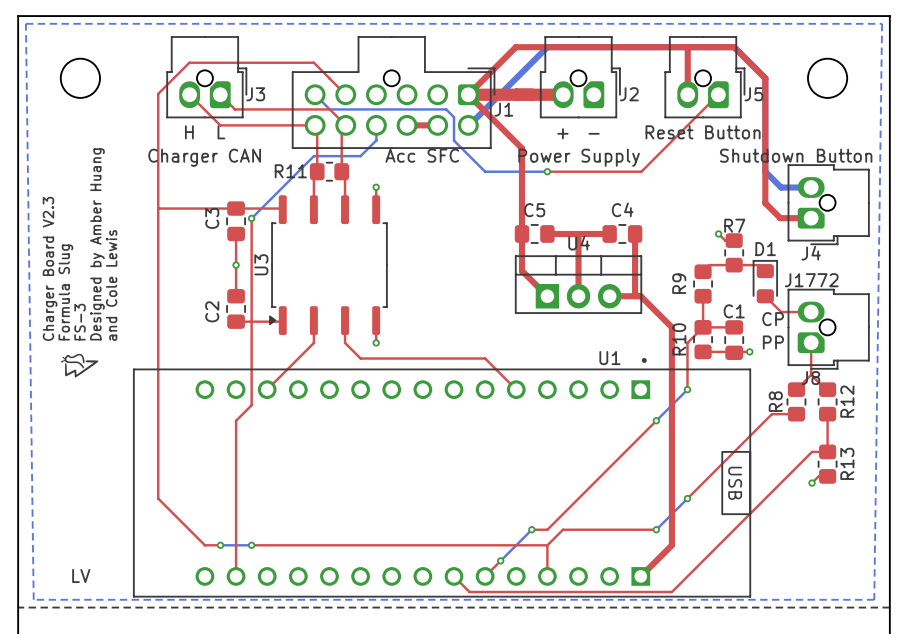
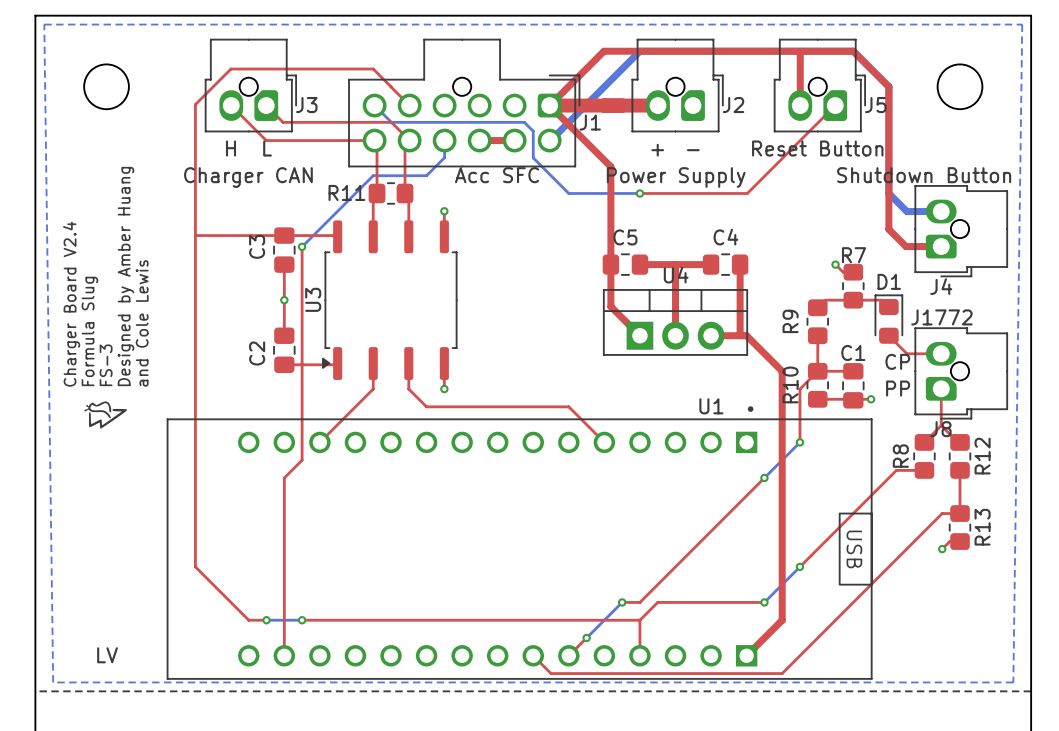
text: Charger Board V2.3 (50, 268) -> Charger Board V2.4 (71, 304)

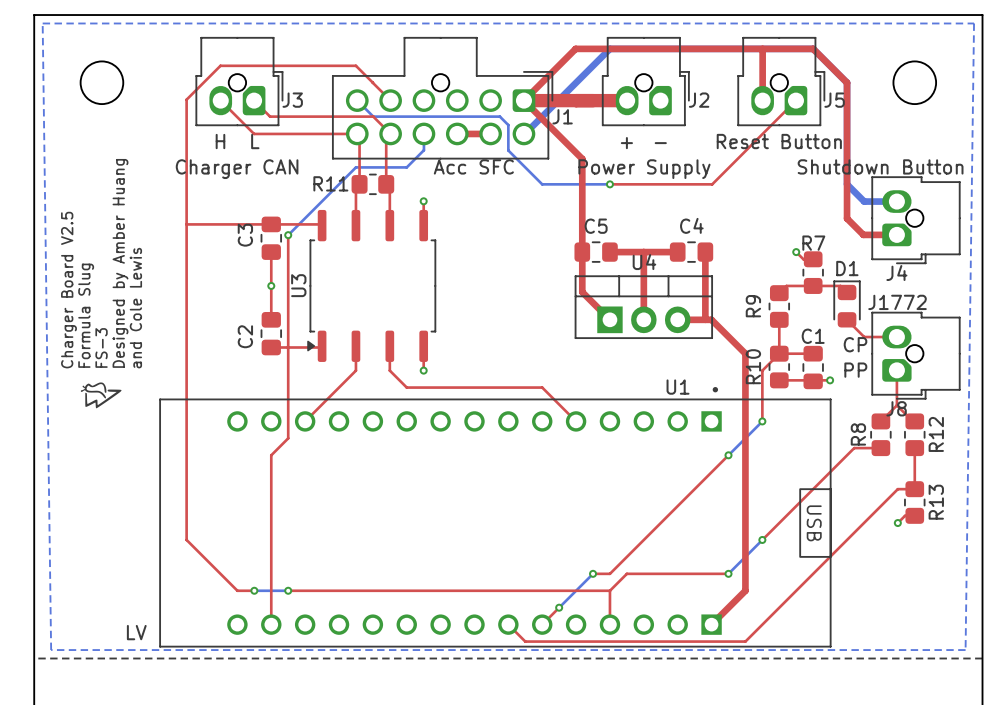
text: Charger Board V2.4 (71, 304) -> Charger Board V2.5 (68, 290)
text position: LV (107, 655) -> LV (136, 632)

